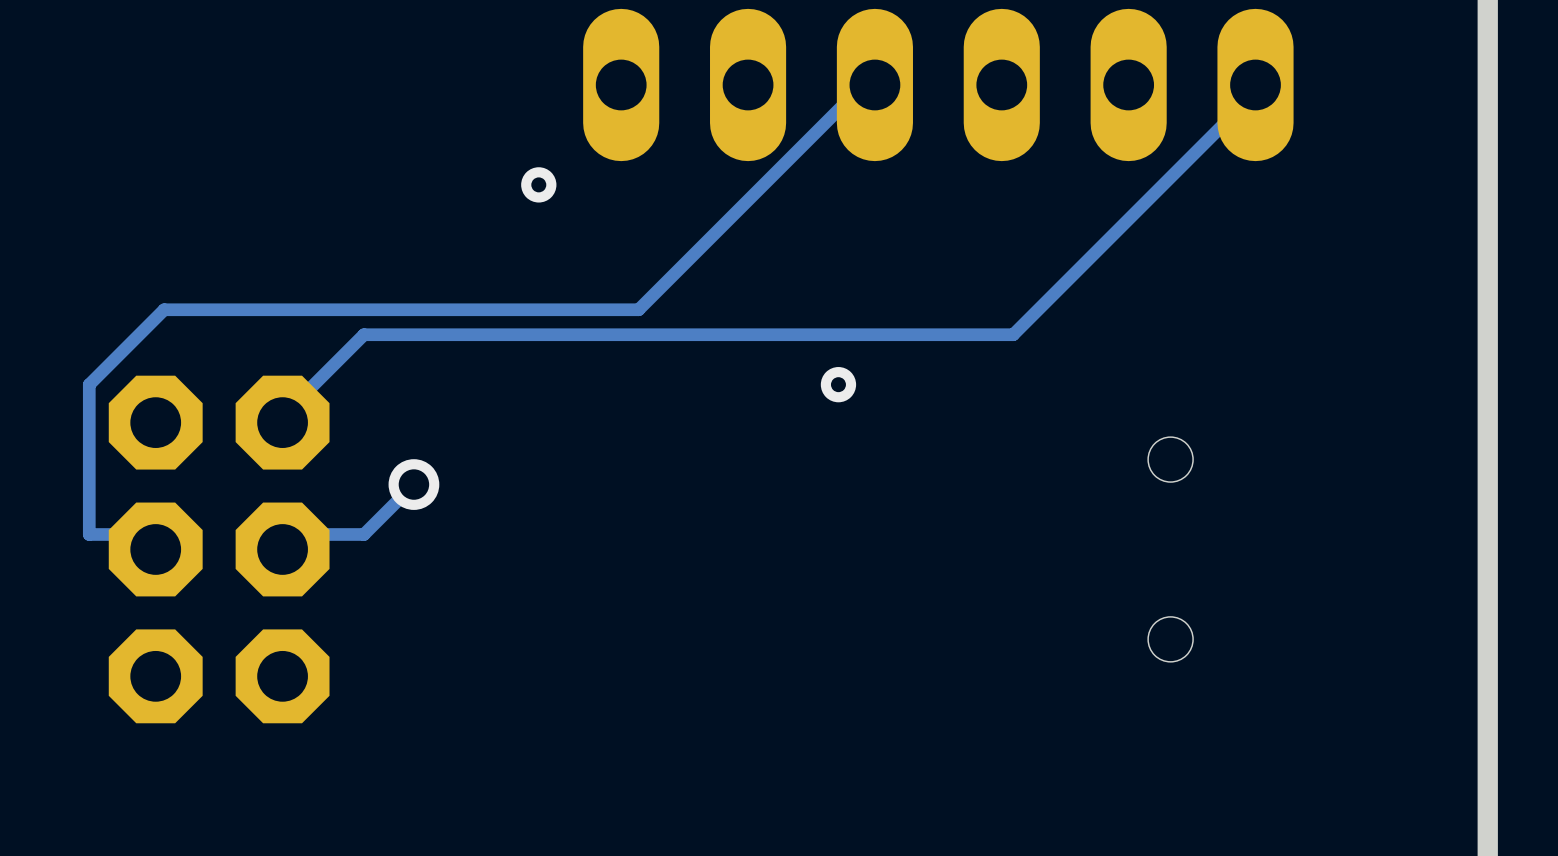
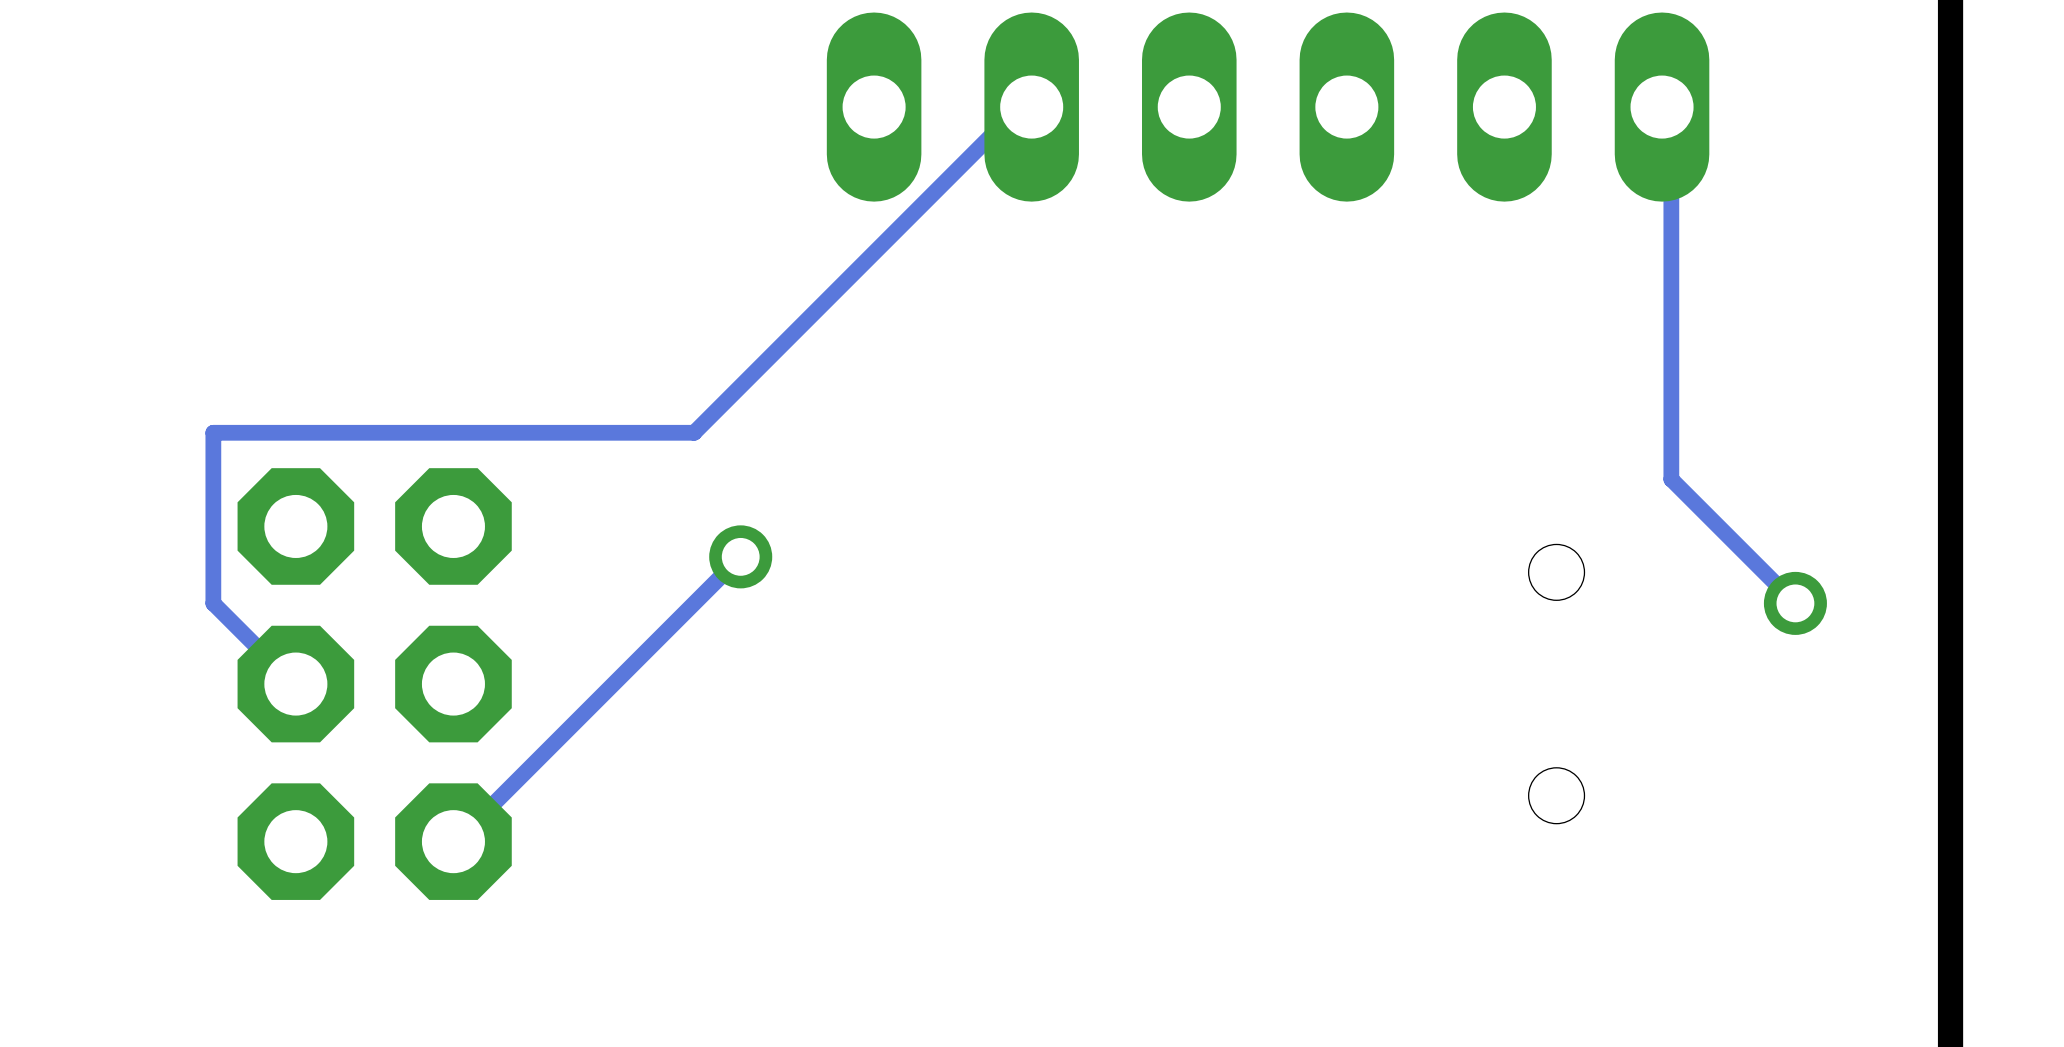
track: (874, 84) (863, 84) (638, 309) (164, 309) (89, 384) -> (1031, 107) (1019, 107) (694, 432) (213, 432) (213, 479)
track: (1263, 84) (1013, 334) (363, 334) (289, 409) (282, 422) -> (1671, 107) (1671, 479) (1795, 603)
via: (538, 184) -> none
via: (838, 384) -> none
track: none -> (740, 556) (461, 836) (453, 841)
track: (89, 484) (89, 534) (139, 534) (155, 549) -> (213, 603) (295, 684)
track: (413, 484) (363, 534) (289, 534) (282, 549) -> none
via position: (413, 484) -> (740, 556)
via: none -> (1795, 603)

